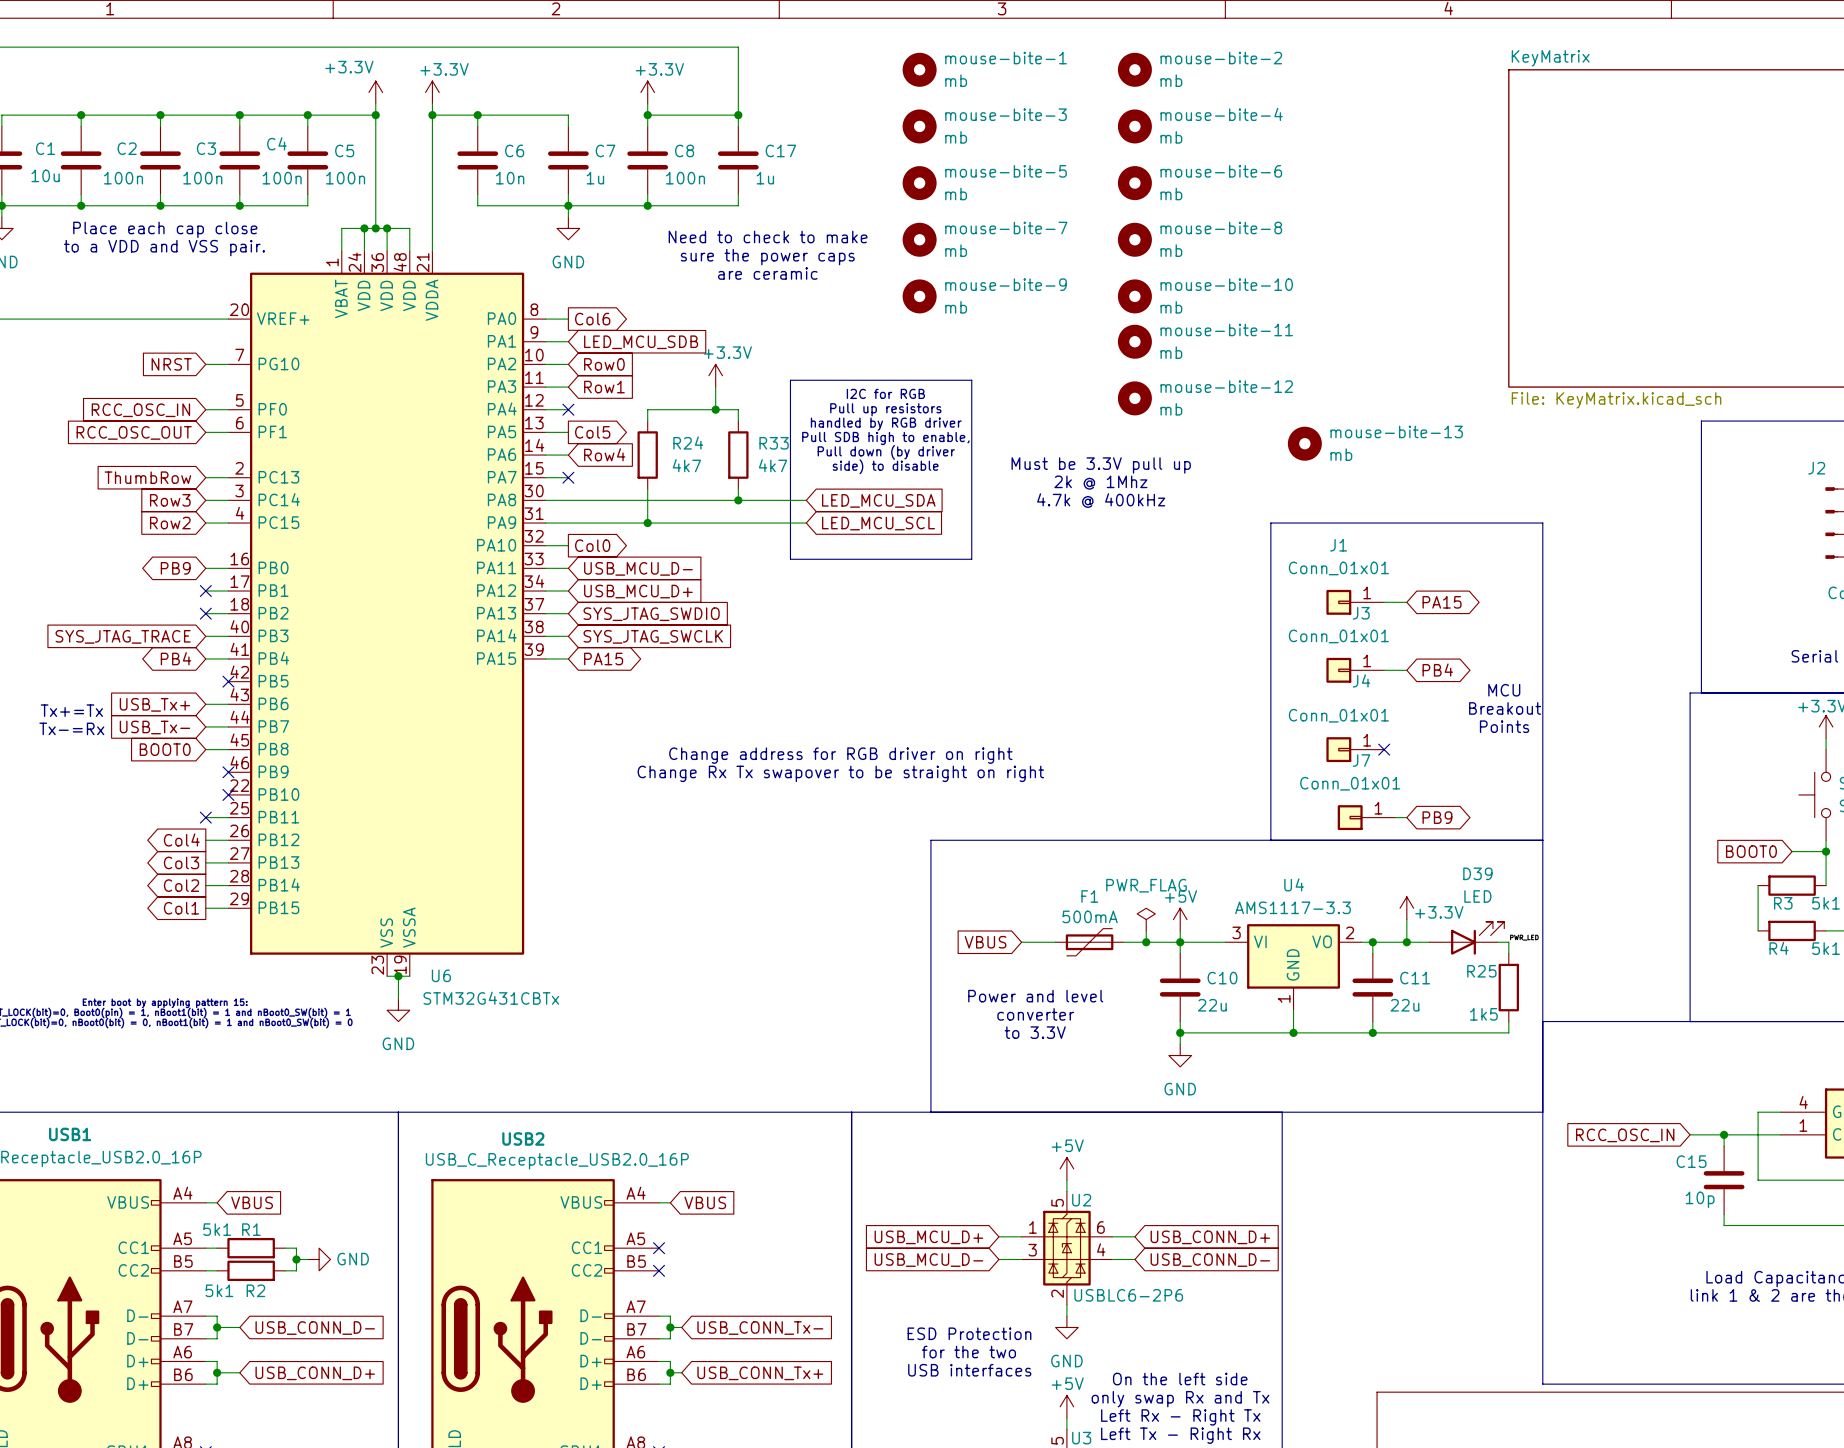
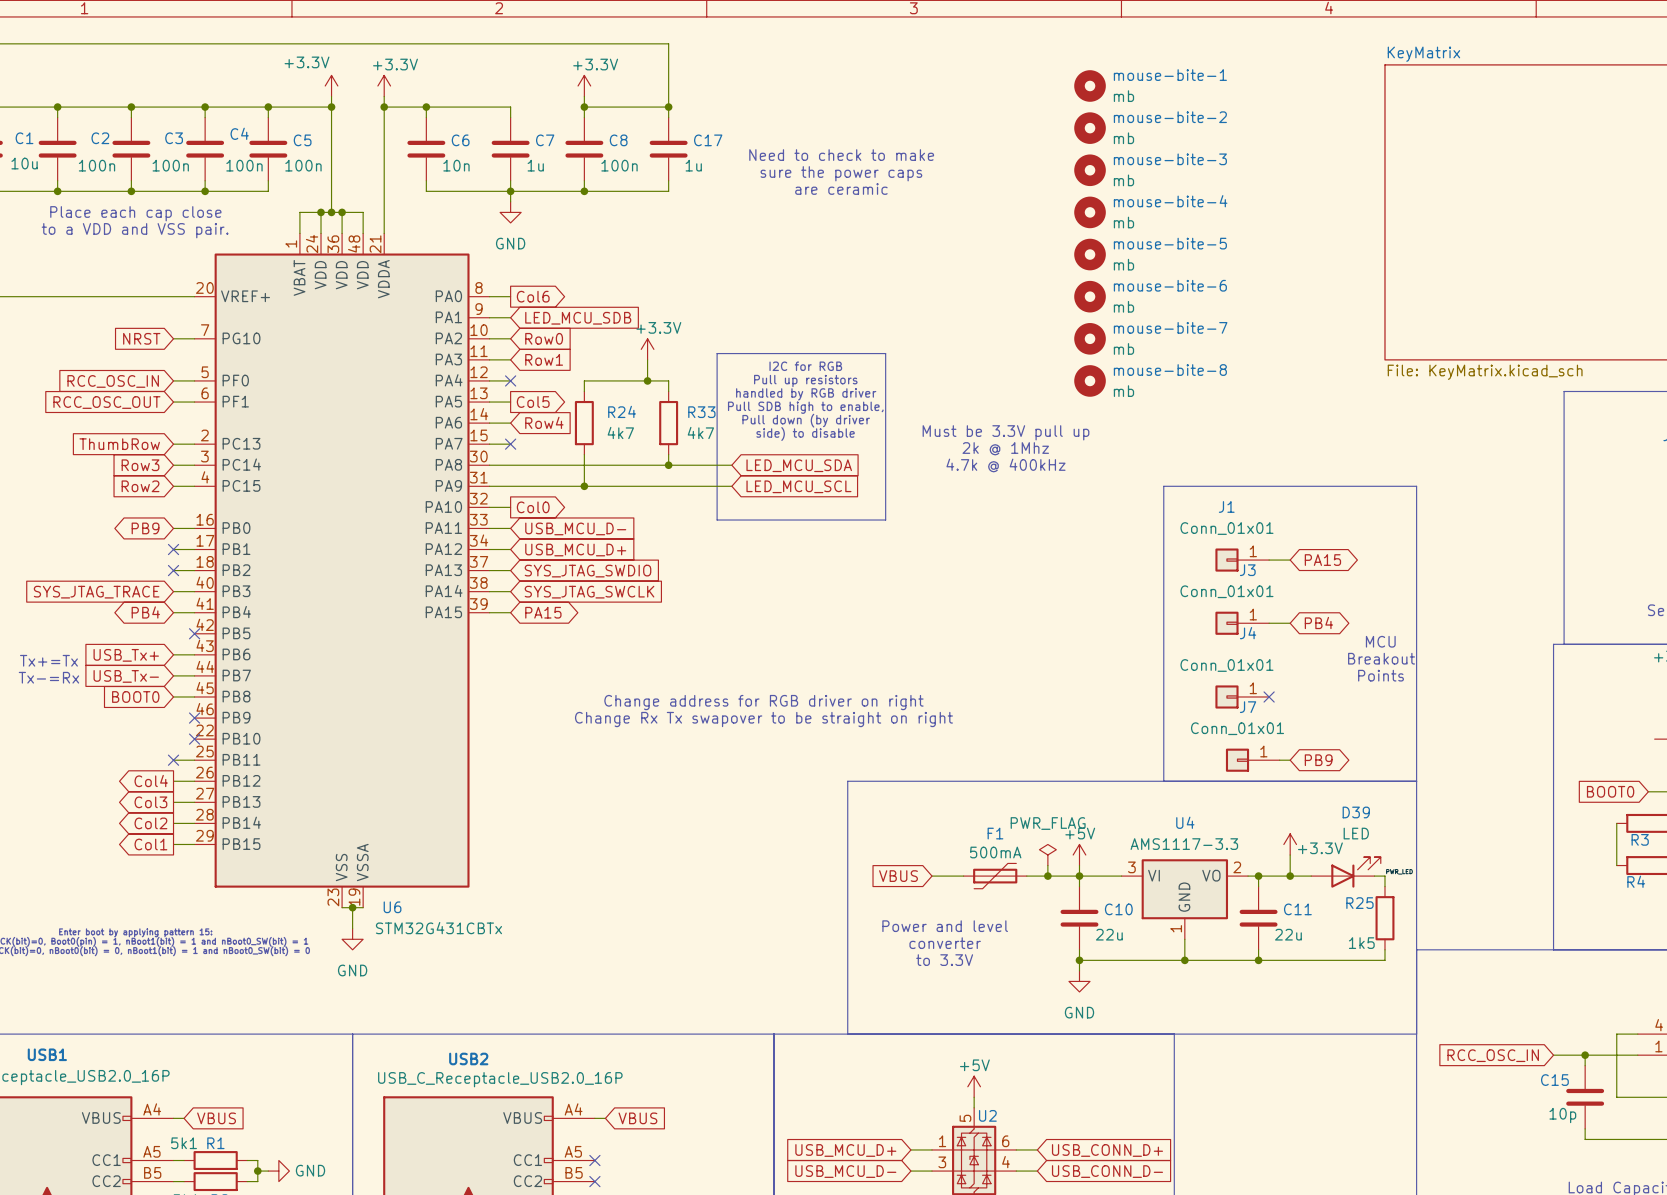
mouse-bite-1 position: (919, 69) -> (1090, 85)
mouse-bite-2 position: (1134, 69) -> (1090, 128)
mouse-bite-3 position: (919, 126) -> (1090, 170)
mouse-bite-4 position: (1134, 126) -> (1090, 212)
mouse-bite-5 position: (919, 183) -> (1090, 254)
mouse-bite-6 position: (1134, 183) -> (1090, 296)
text position: Need to check to make (768, 236) -> Need to check to make (841, 155)
mouse-bite-7 position: (919, 239) -> (1090, 338)
mouse-bite-8 position: (1134, 239) -> (1090, 380)
text position: sure the power caps (767, 257) -> sure the power caps (841, 173)
text position: are ceramic (767, 273) -> are ceramic (841, 188)
mouse-bite-9: mb (919, 296) -> none
mouse-bite-10: mb (1134, 296) -> none
mouse-bite-11: mb (1134, 341) -> none
mouse-bite-12: mb (1134, 398) -> none
mouse-bite-13: mb (1304, 443) -> none

